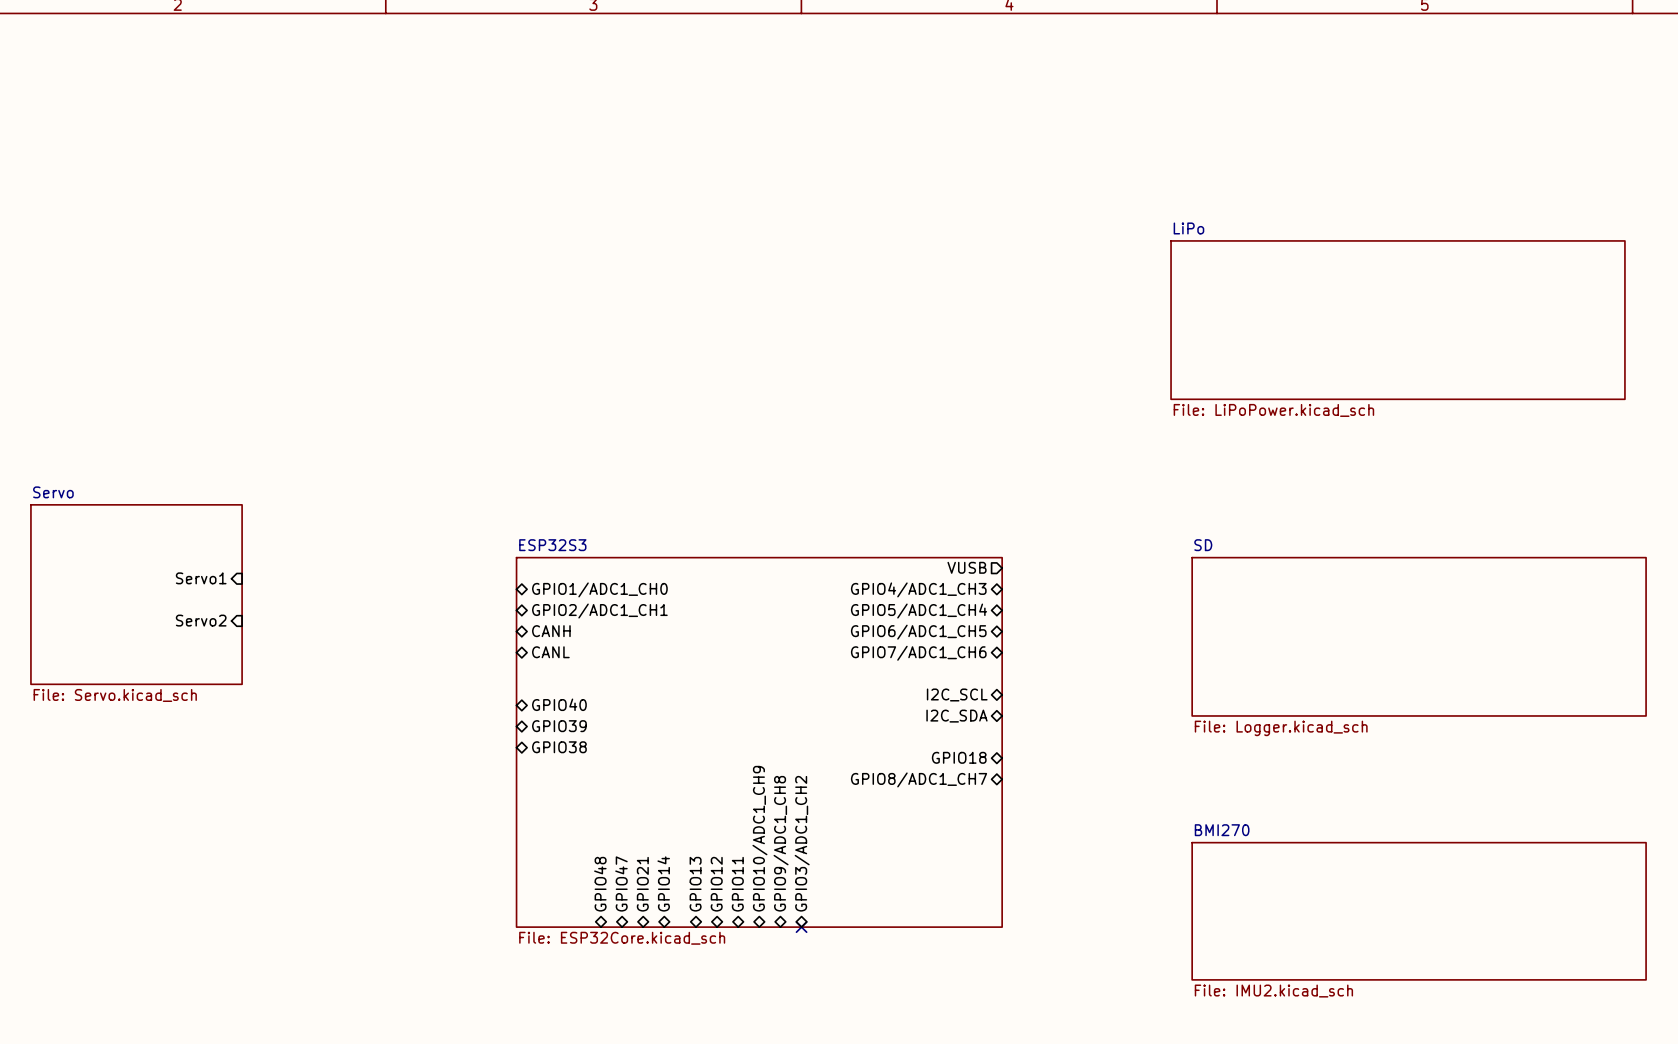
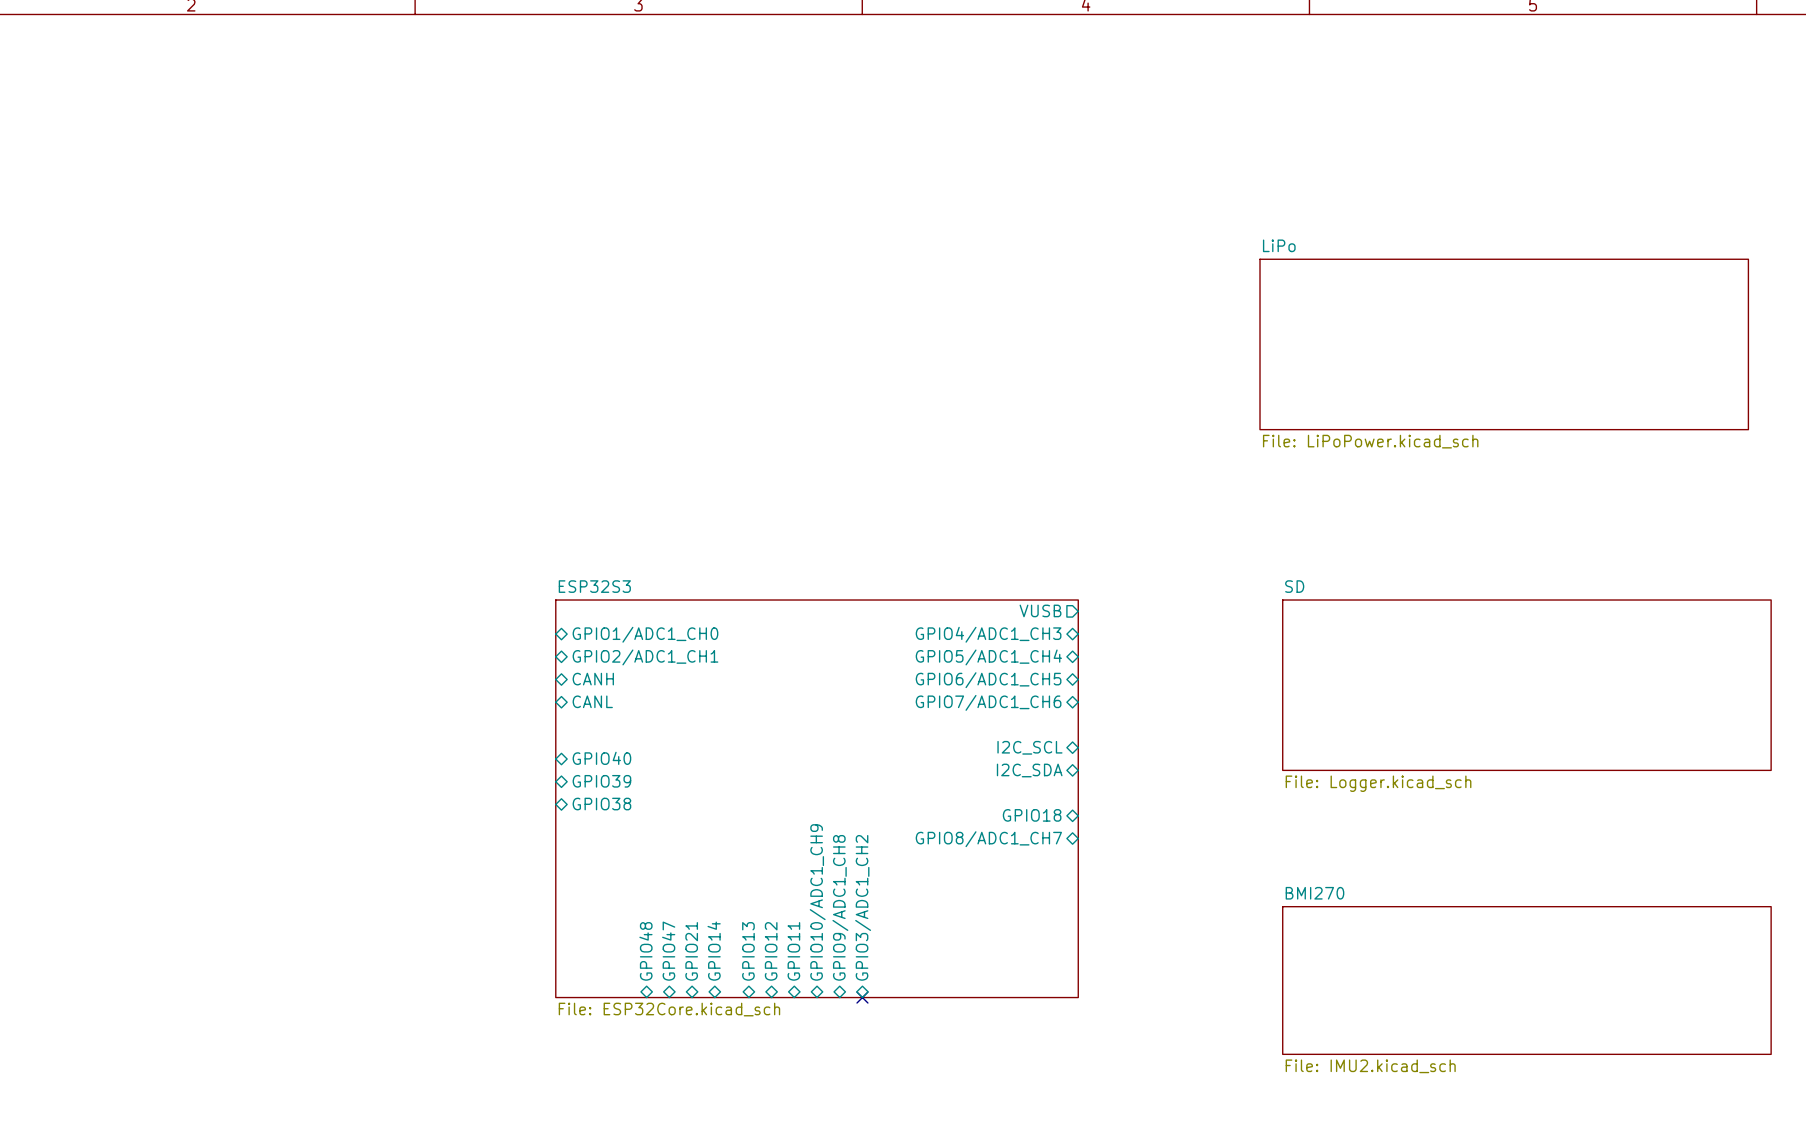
sheet pin: Servo1 (201, 578) -> none
sheet Servo: File: Servo.kicad_sch (136, 594) -> none
sheet pin: Servo2 (201, 620) -> none

